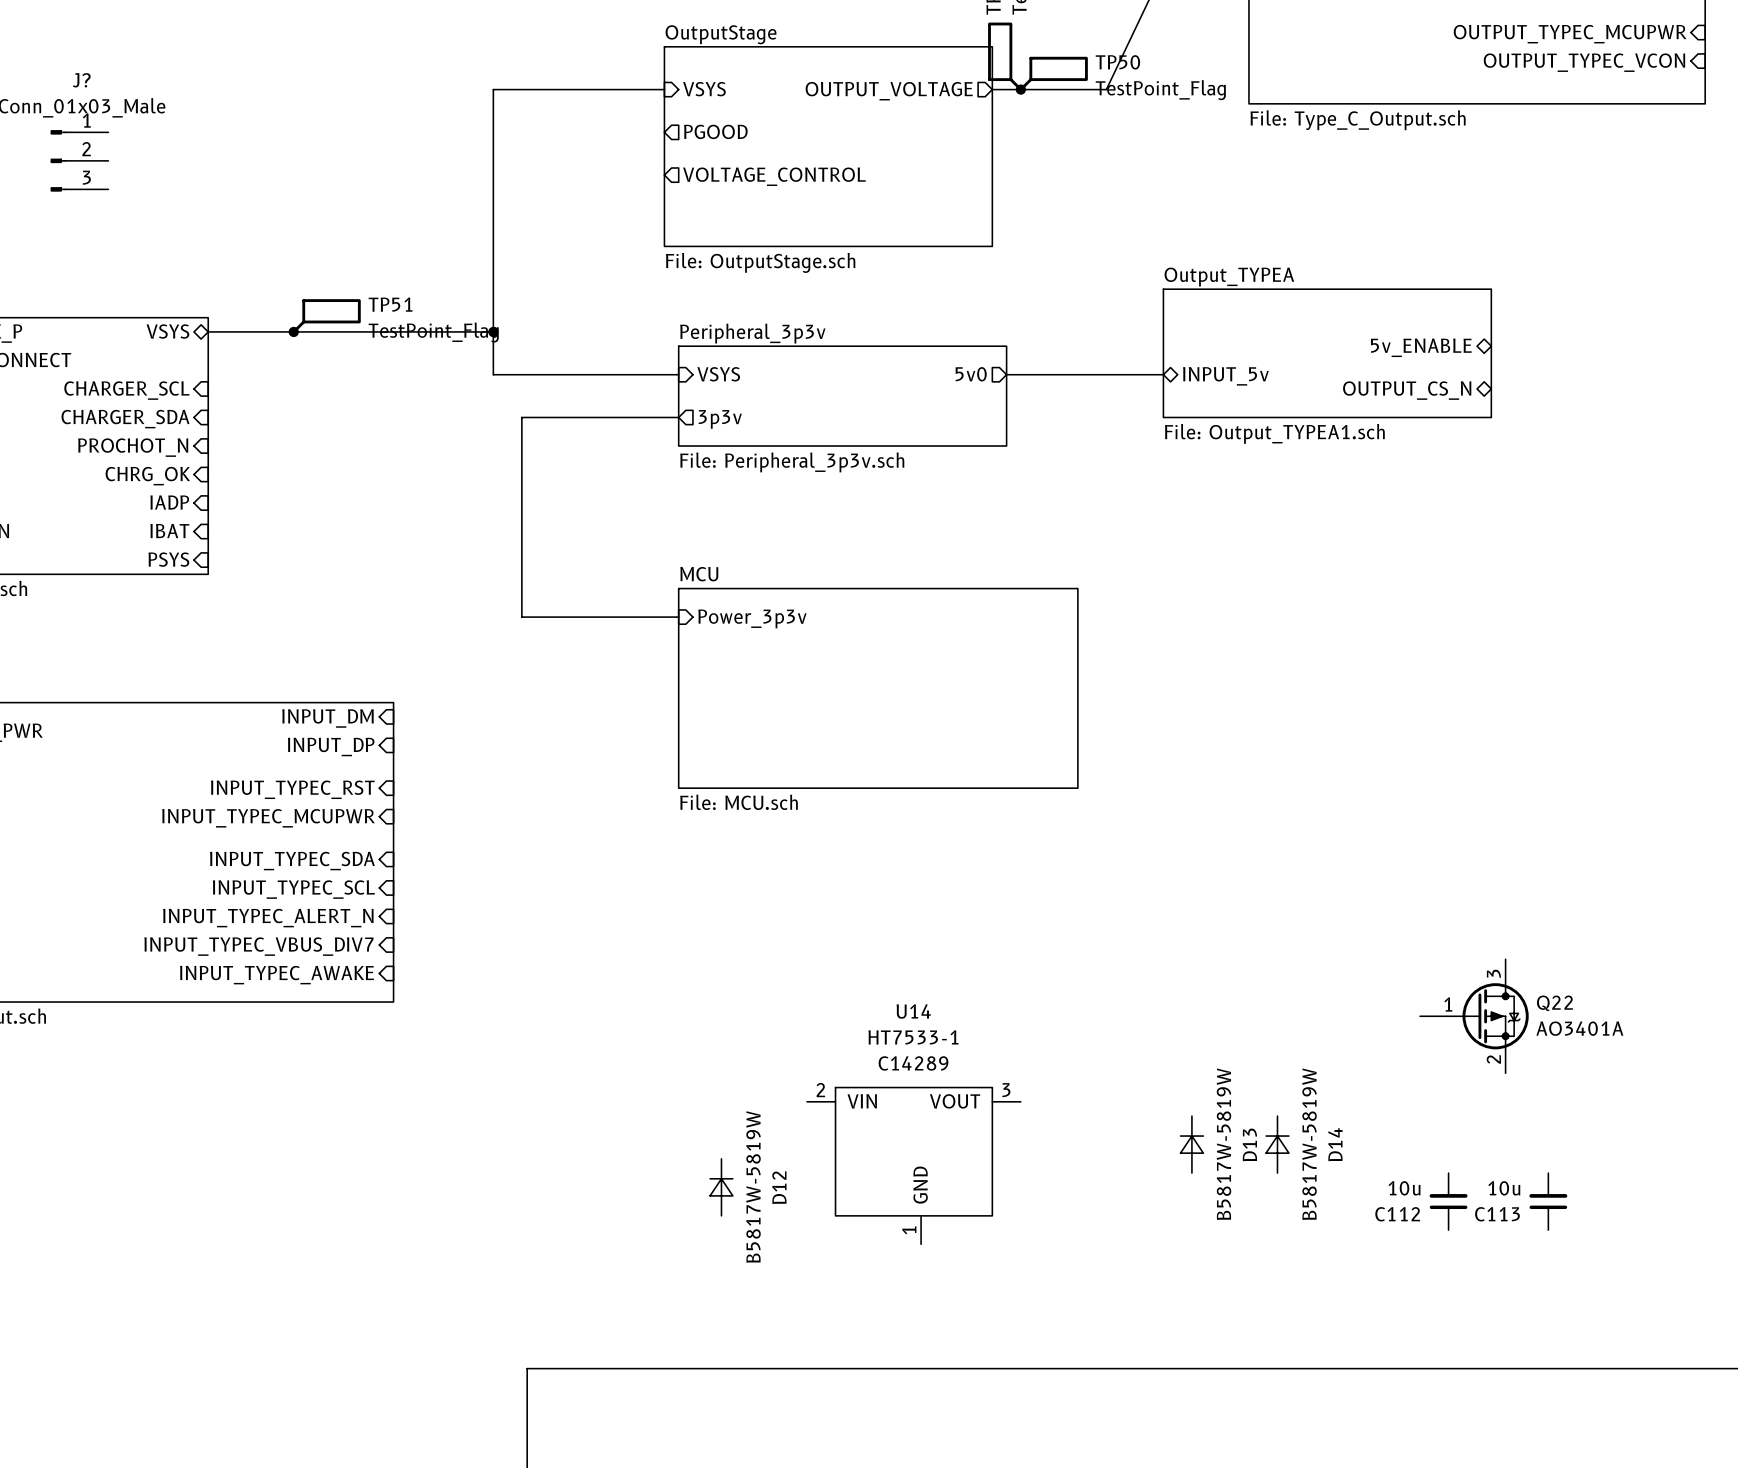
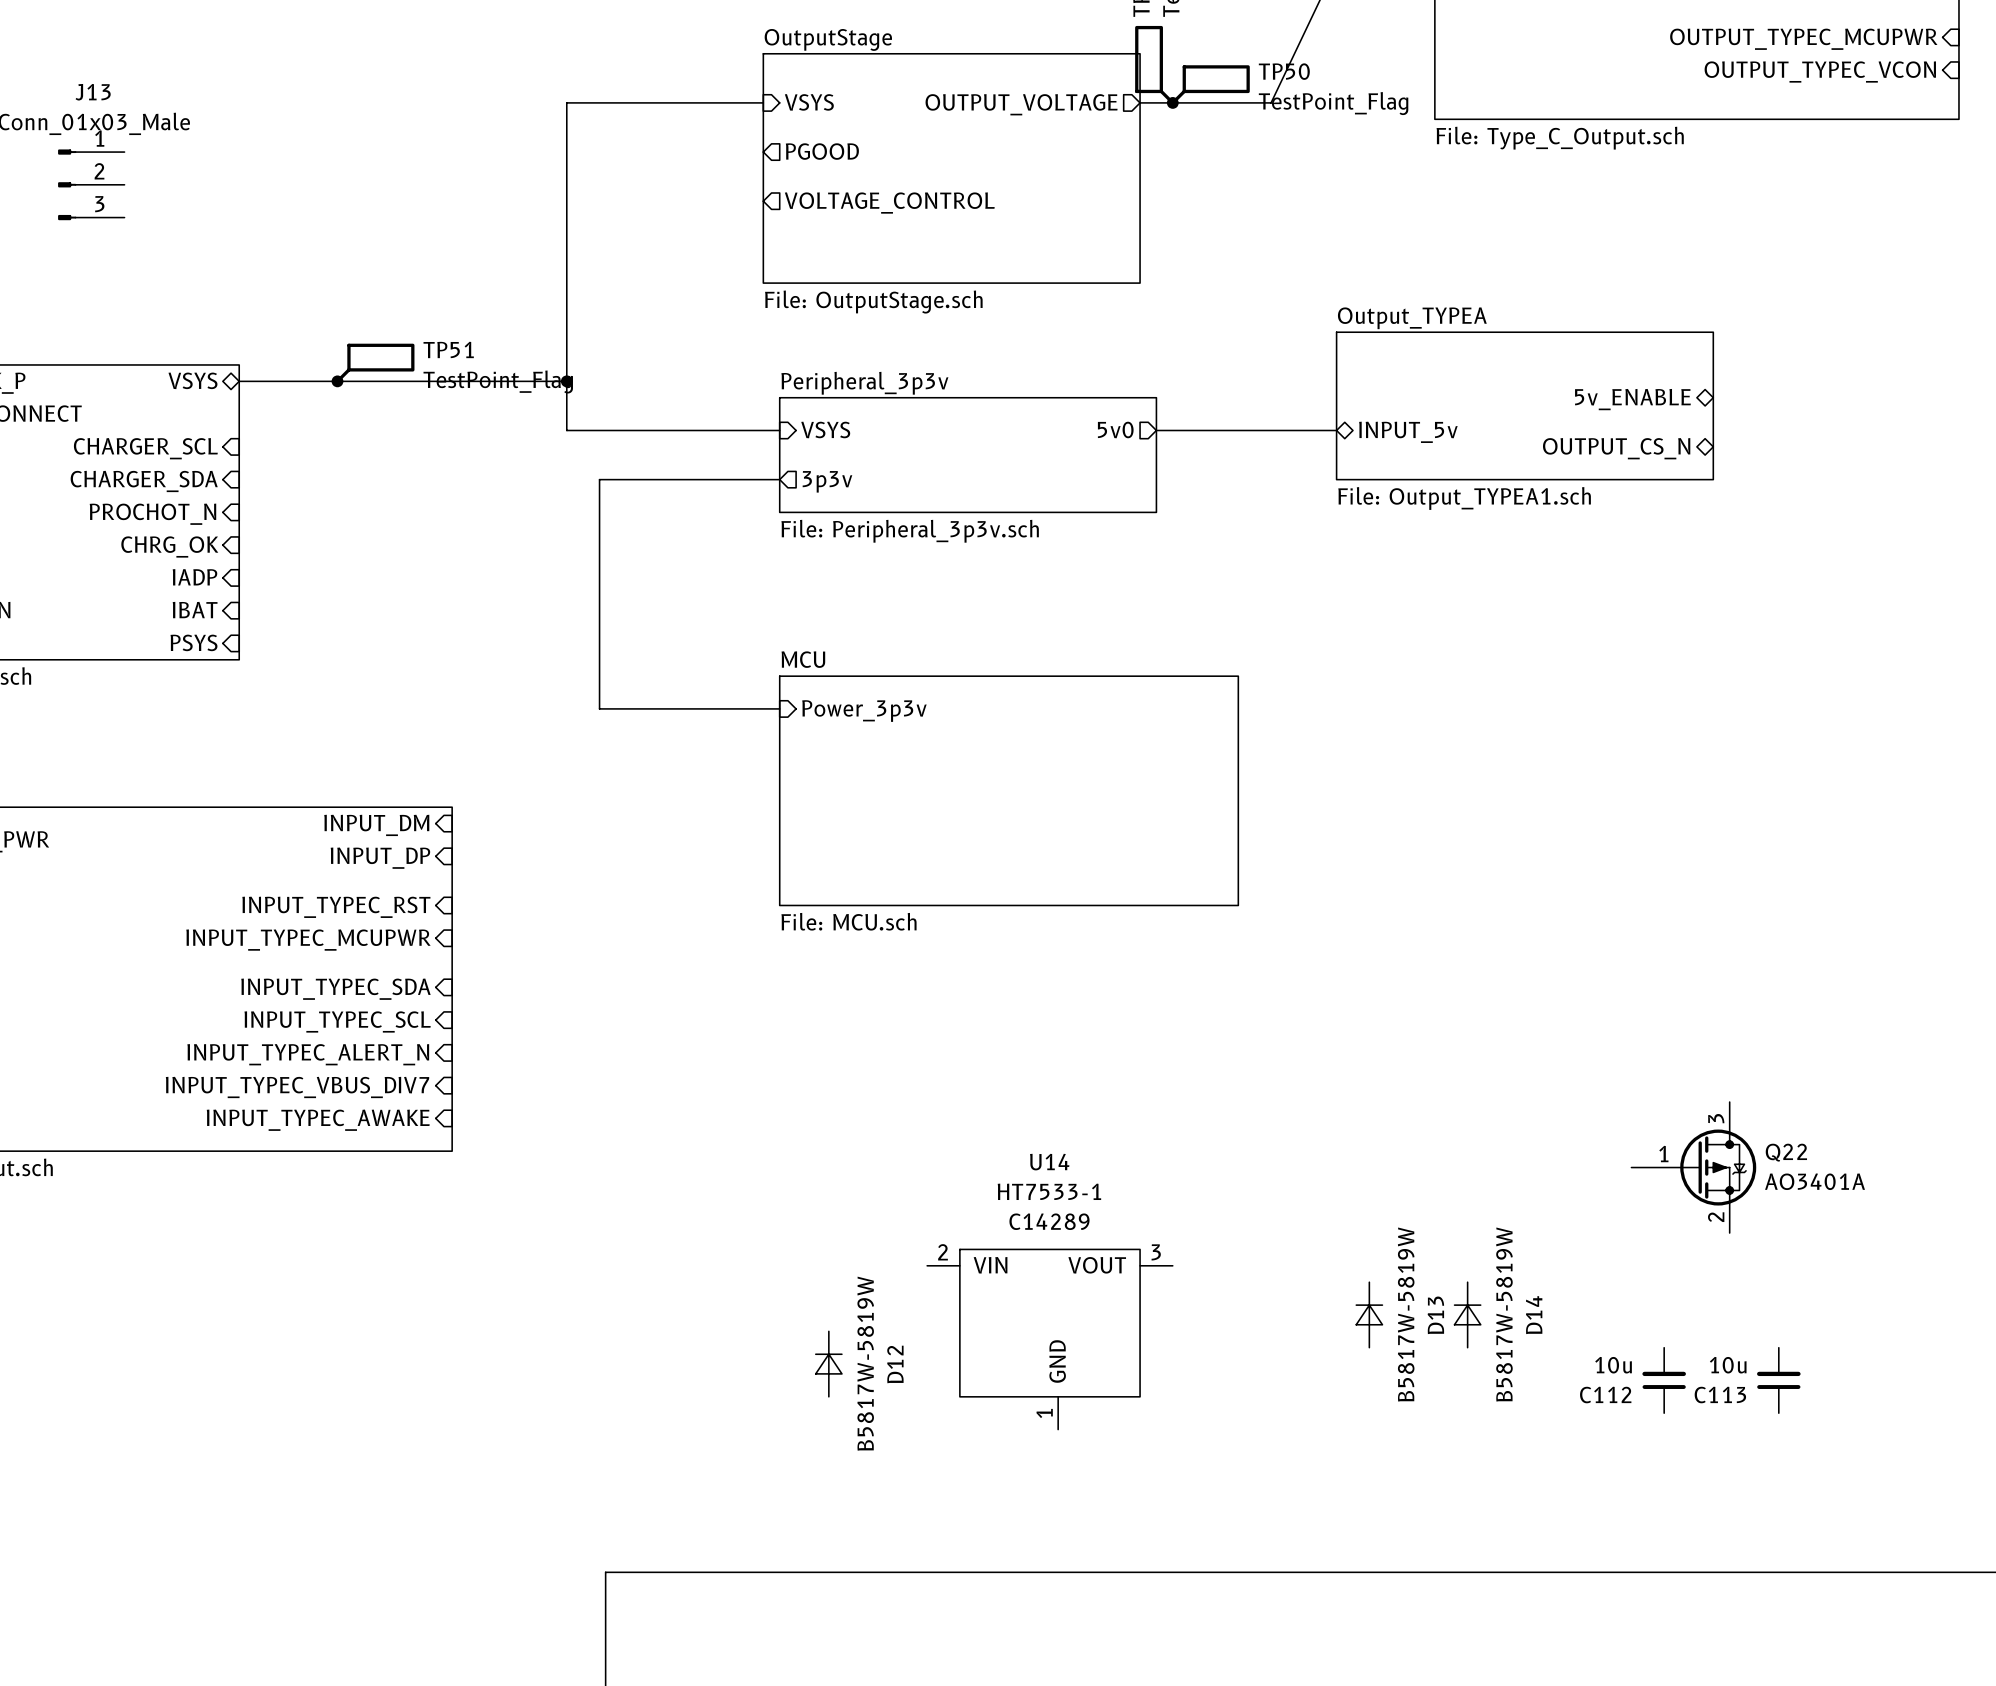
J? name: J? (81, 80) -> J13 (93, 92)

